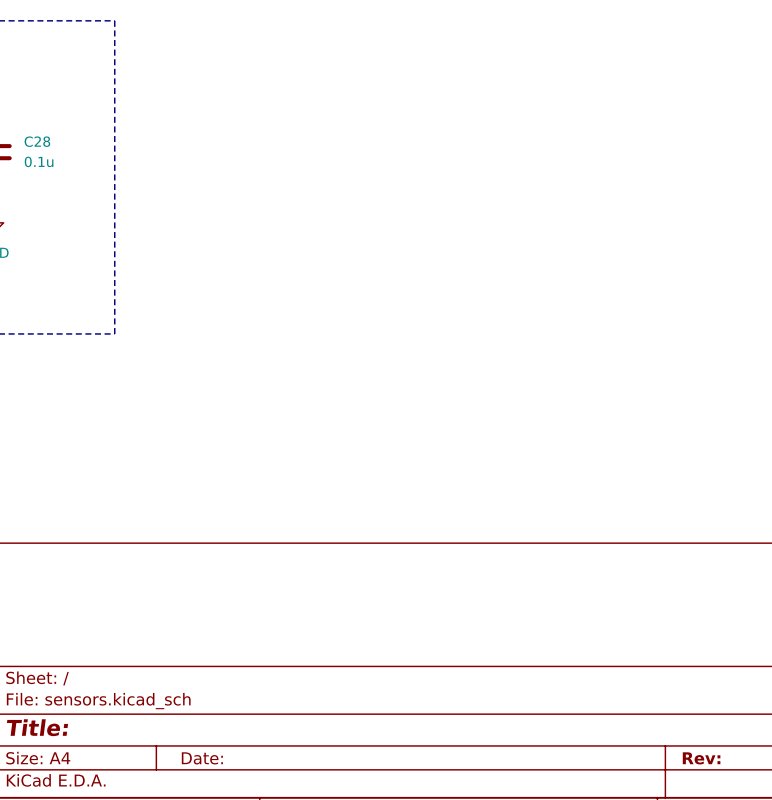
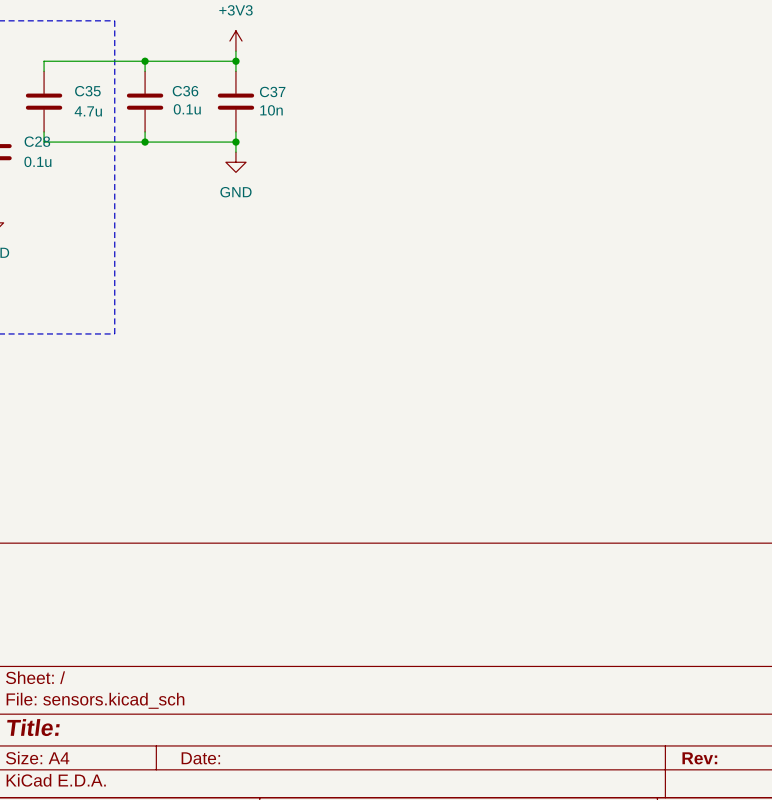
power symbol: none -> +3V3 (235, 41)
wire: none -> (235, 51) (235, 71)
wire: none -> (145, 61) (145, 71)
junction: none -> (145, 61)
wire: none -> (235, 61) (44, 61) (44, 71)
junction: none -> (235, 61)
C35: none -> 4.7u (44, 101)
C36: none -> 0.1u (145, 101)
C37: none -> 10n (235, 101)
wire: none -> (44, 131) (44, 142) (235, 142)
wire: none -> (145, 131) (145, 142)
wire: none -> (235, 131) (235, 152)
junction: none -> (145, 142)
junction: none -> (235, 142)
power symbol: none -> GND (235, 162)

